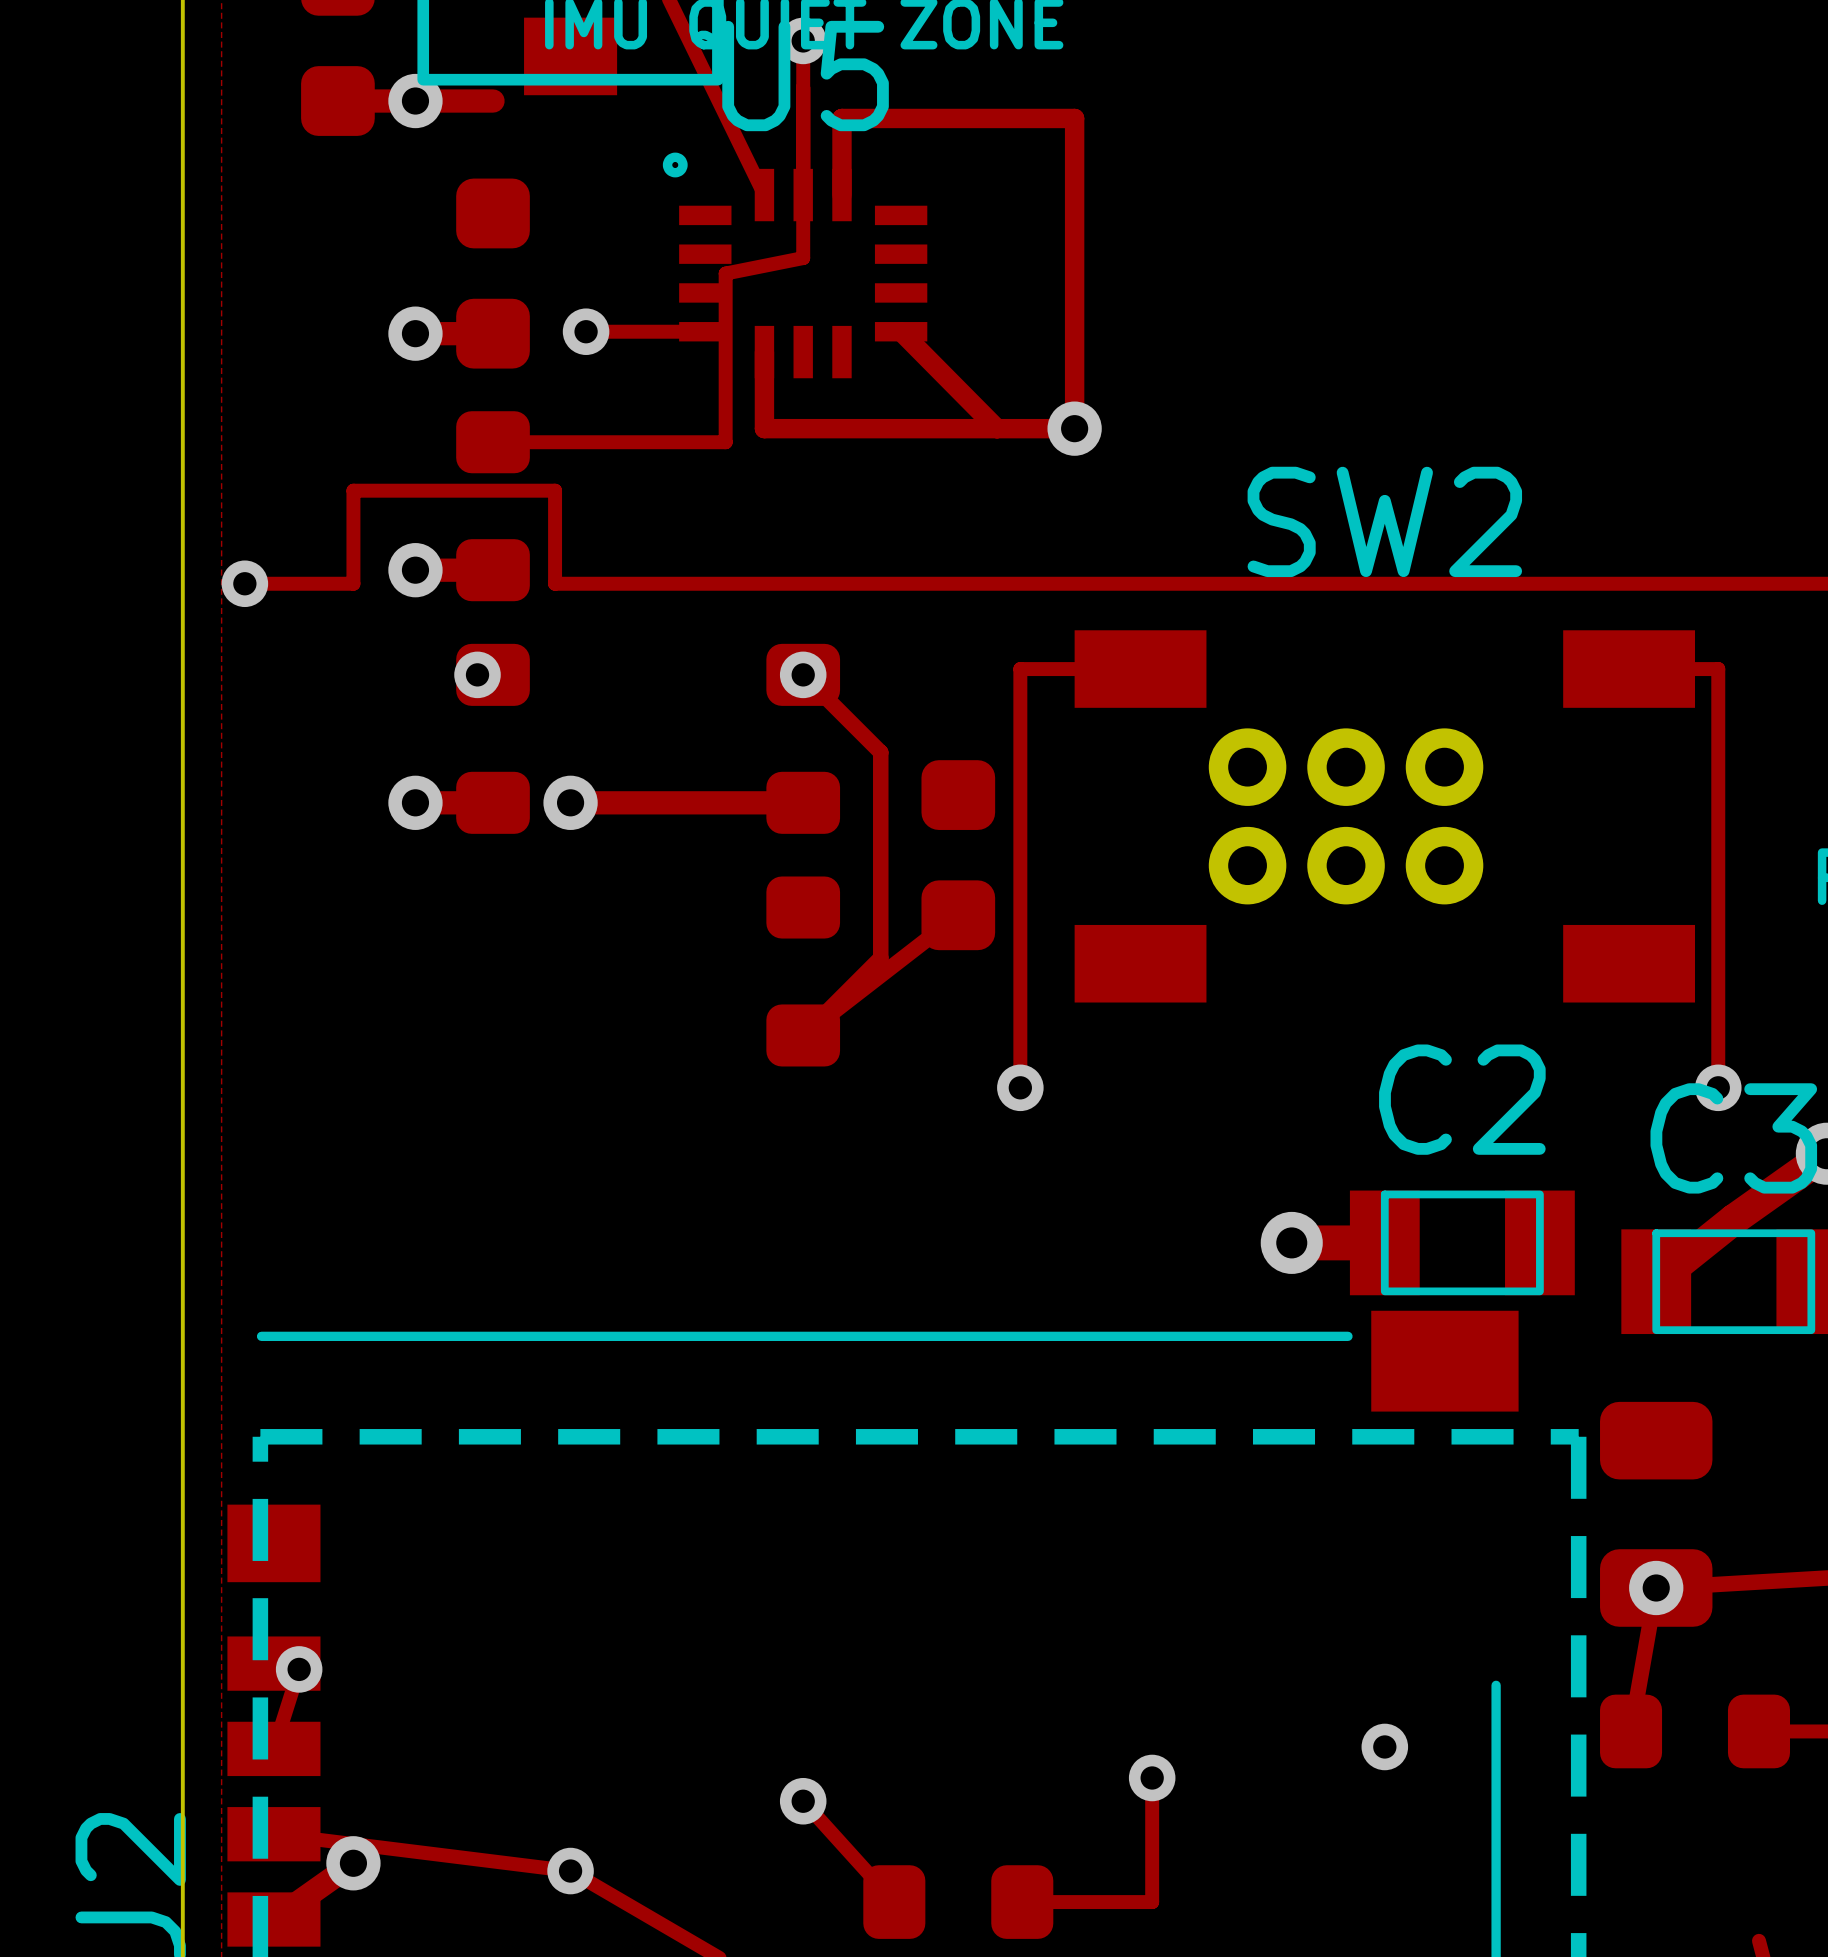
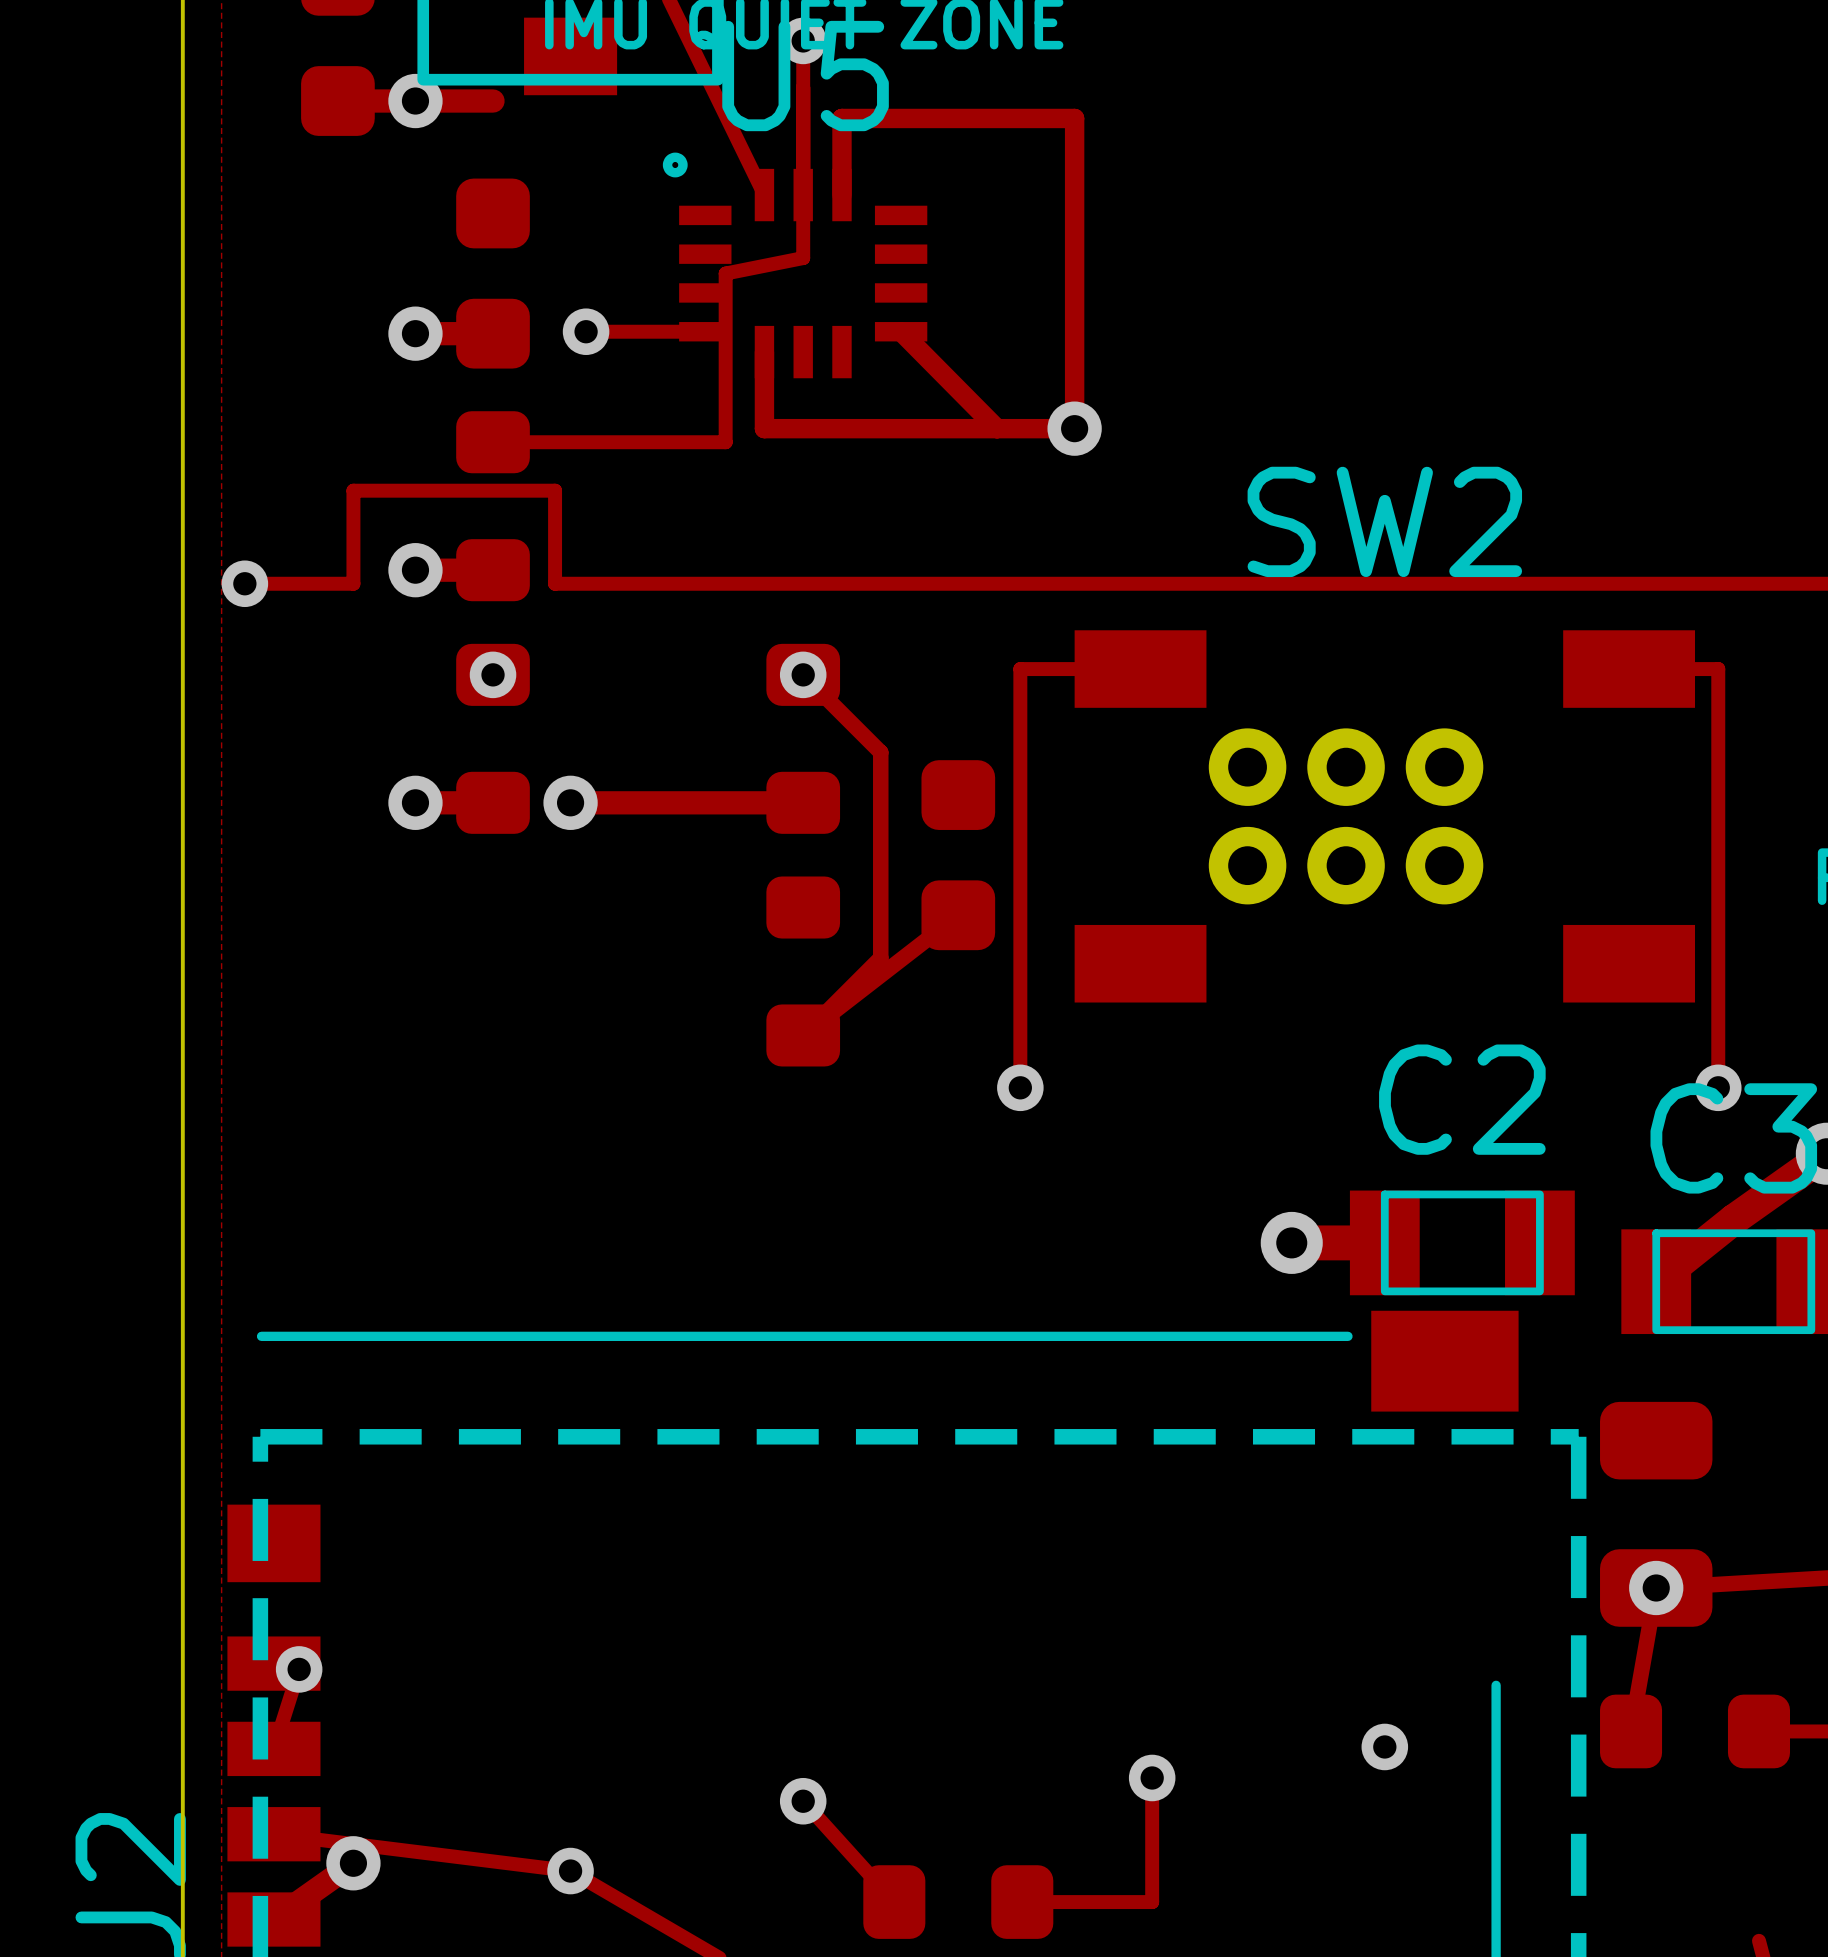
via position: (477, 674) -> (493, 674)

